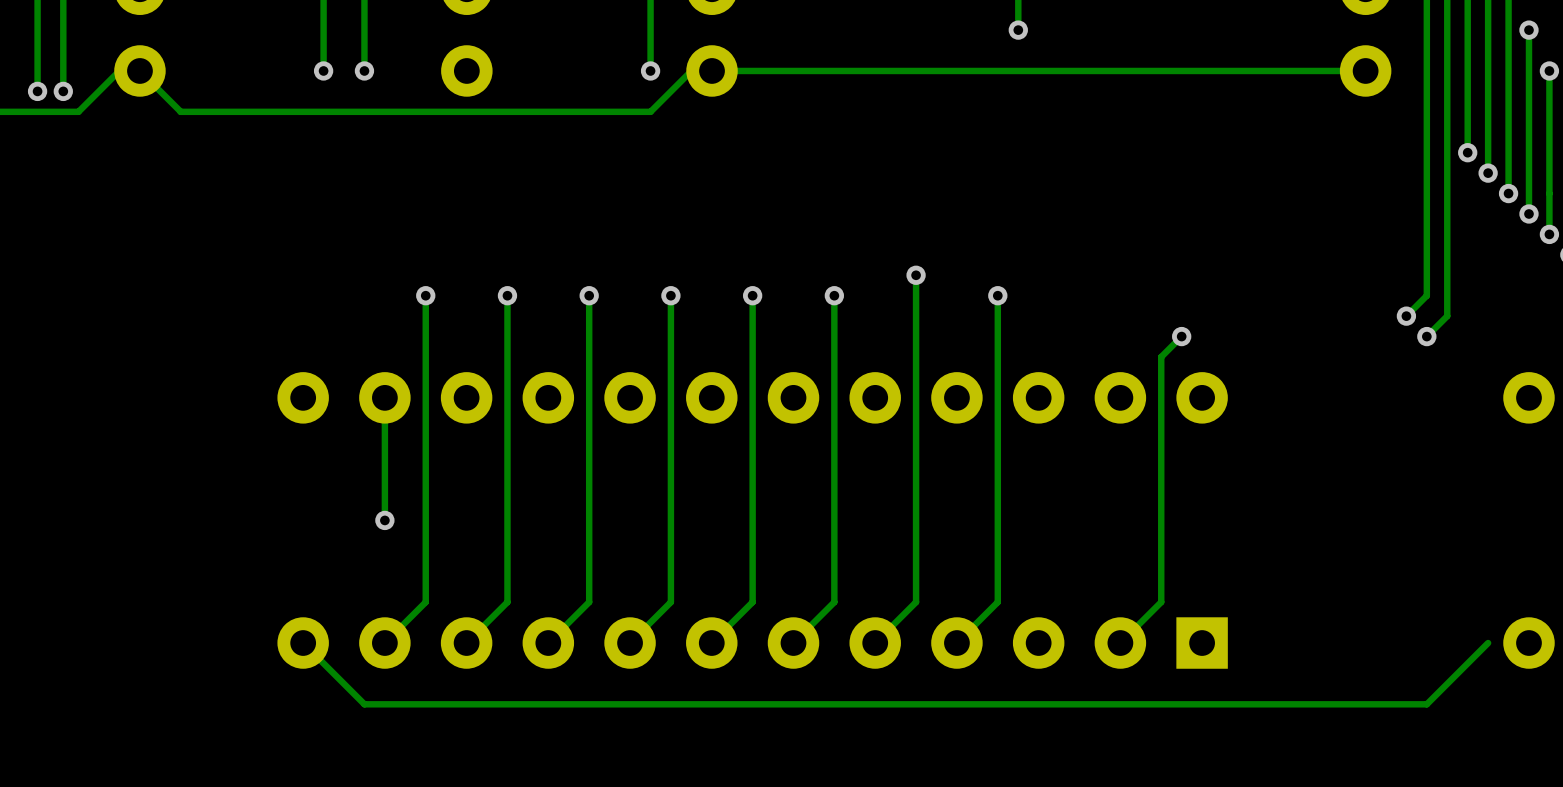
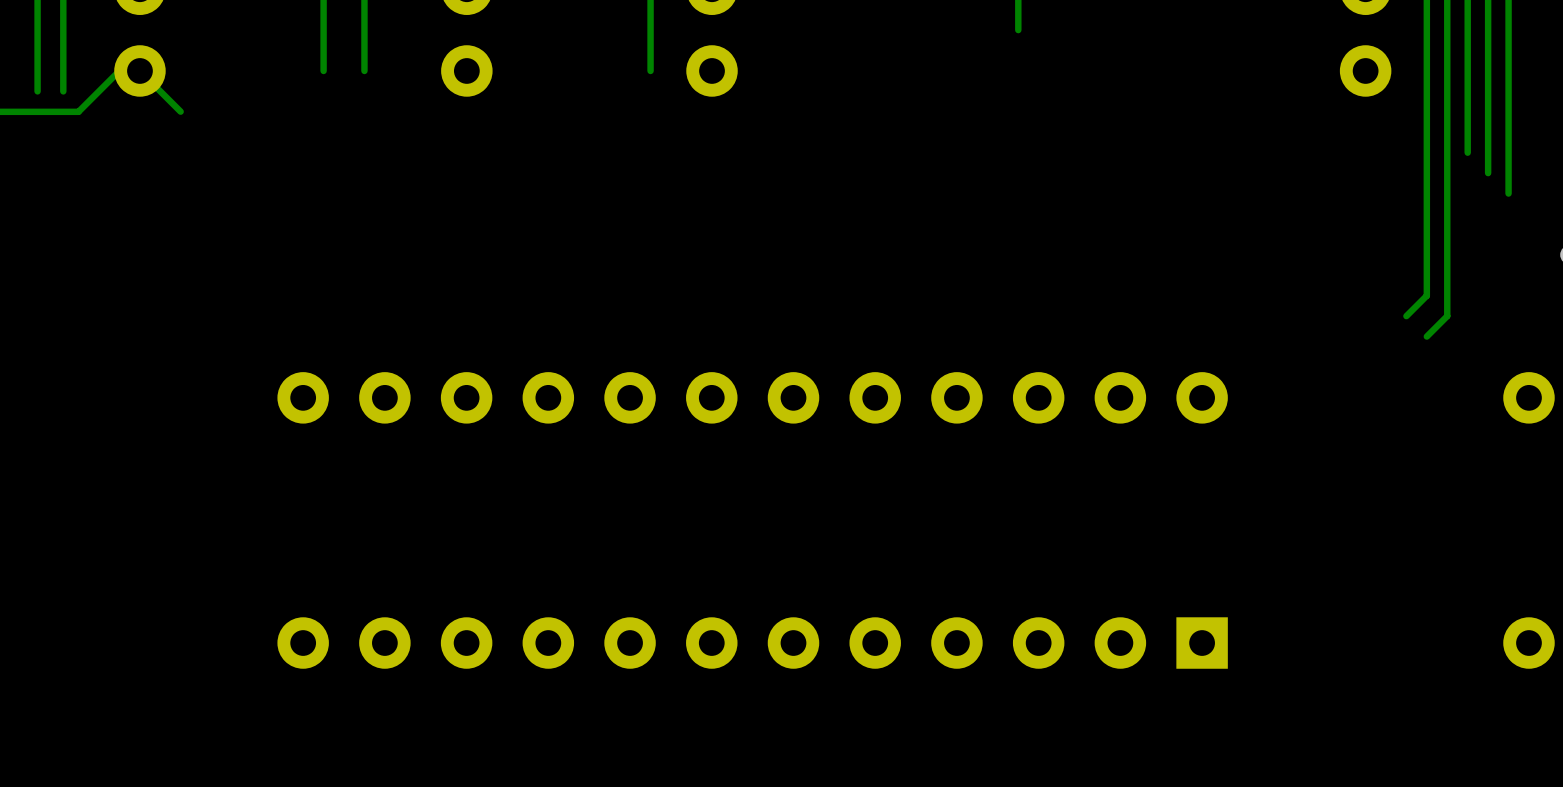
via: (1018, 30) -> none
track: (1528, 30) (1528, 213) -> none
via: (1528, 30) -> none
via: (323, 70) -> none
via: (364, 70) -> none
via: (650, 70) -> none
track: (1365, 70) (691, 70) (650, 111) (180, 111) -> none
track: (1549, 70) (1549, 234) -> none
via: (1549, 70) -> none
via: (37, 91) -> none
via: (63, 91) -> none
via: (1467, 152) -> none
via: (1488, 173) -> none
via: (1508, 193) -> none
via: (1528, 213) -> none
via: (1549, 234) -> none
track: (916, 275) (916, 602) (875, 643) -> none
via: (916, 275) -> none
track: (425, 295) (425, 602) (384, 643) -> none
via: (425, 295) -> none
track: (507, 295) (507, 602) (466, 643) -> none
via: (507, 295) -> none
track: (589, 295) (589, 602) (548, 643) -> none
via: (589, 295) -> none
track: (670, 295) (670, 602) (630, 643) -> none
via: (670, 295) -> none
track: (752, 295) (752, 602) (711, 643) -> none
via: (752, 295) -> none
track: (834, 295) (834, 602) (793, 643) -> none
via: (834, 295) -> none
track: (997, 295) (997, 602) (956, 643) -> none
via: (997, 295) -> none
via: (1406, 316) -> none
track: (1181, 336) (1161, 356) (1161, 602) (1120, 643) -> none
via: (1181, 336) -> none
via: (1426, 336) -> none
track: (384, 397) (384, 520) -> none
via: (384, 520) -> none
track: (1488, 643) (1426, 704) (364, 704) (303, 643) -> none

